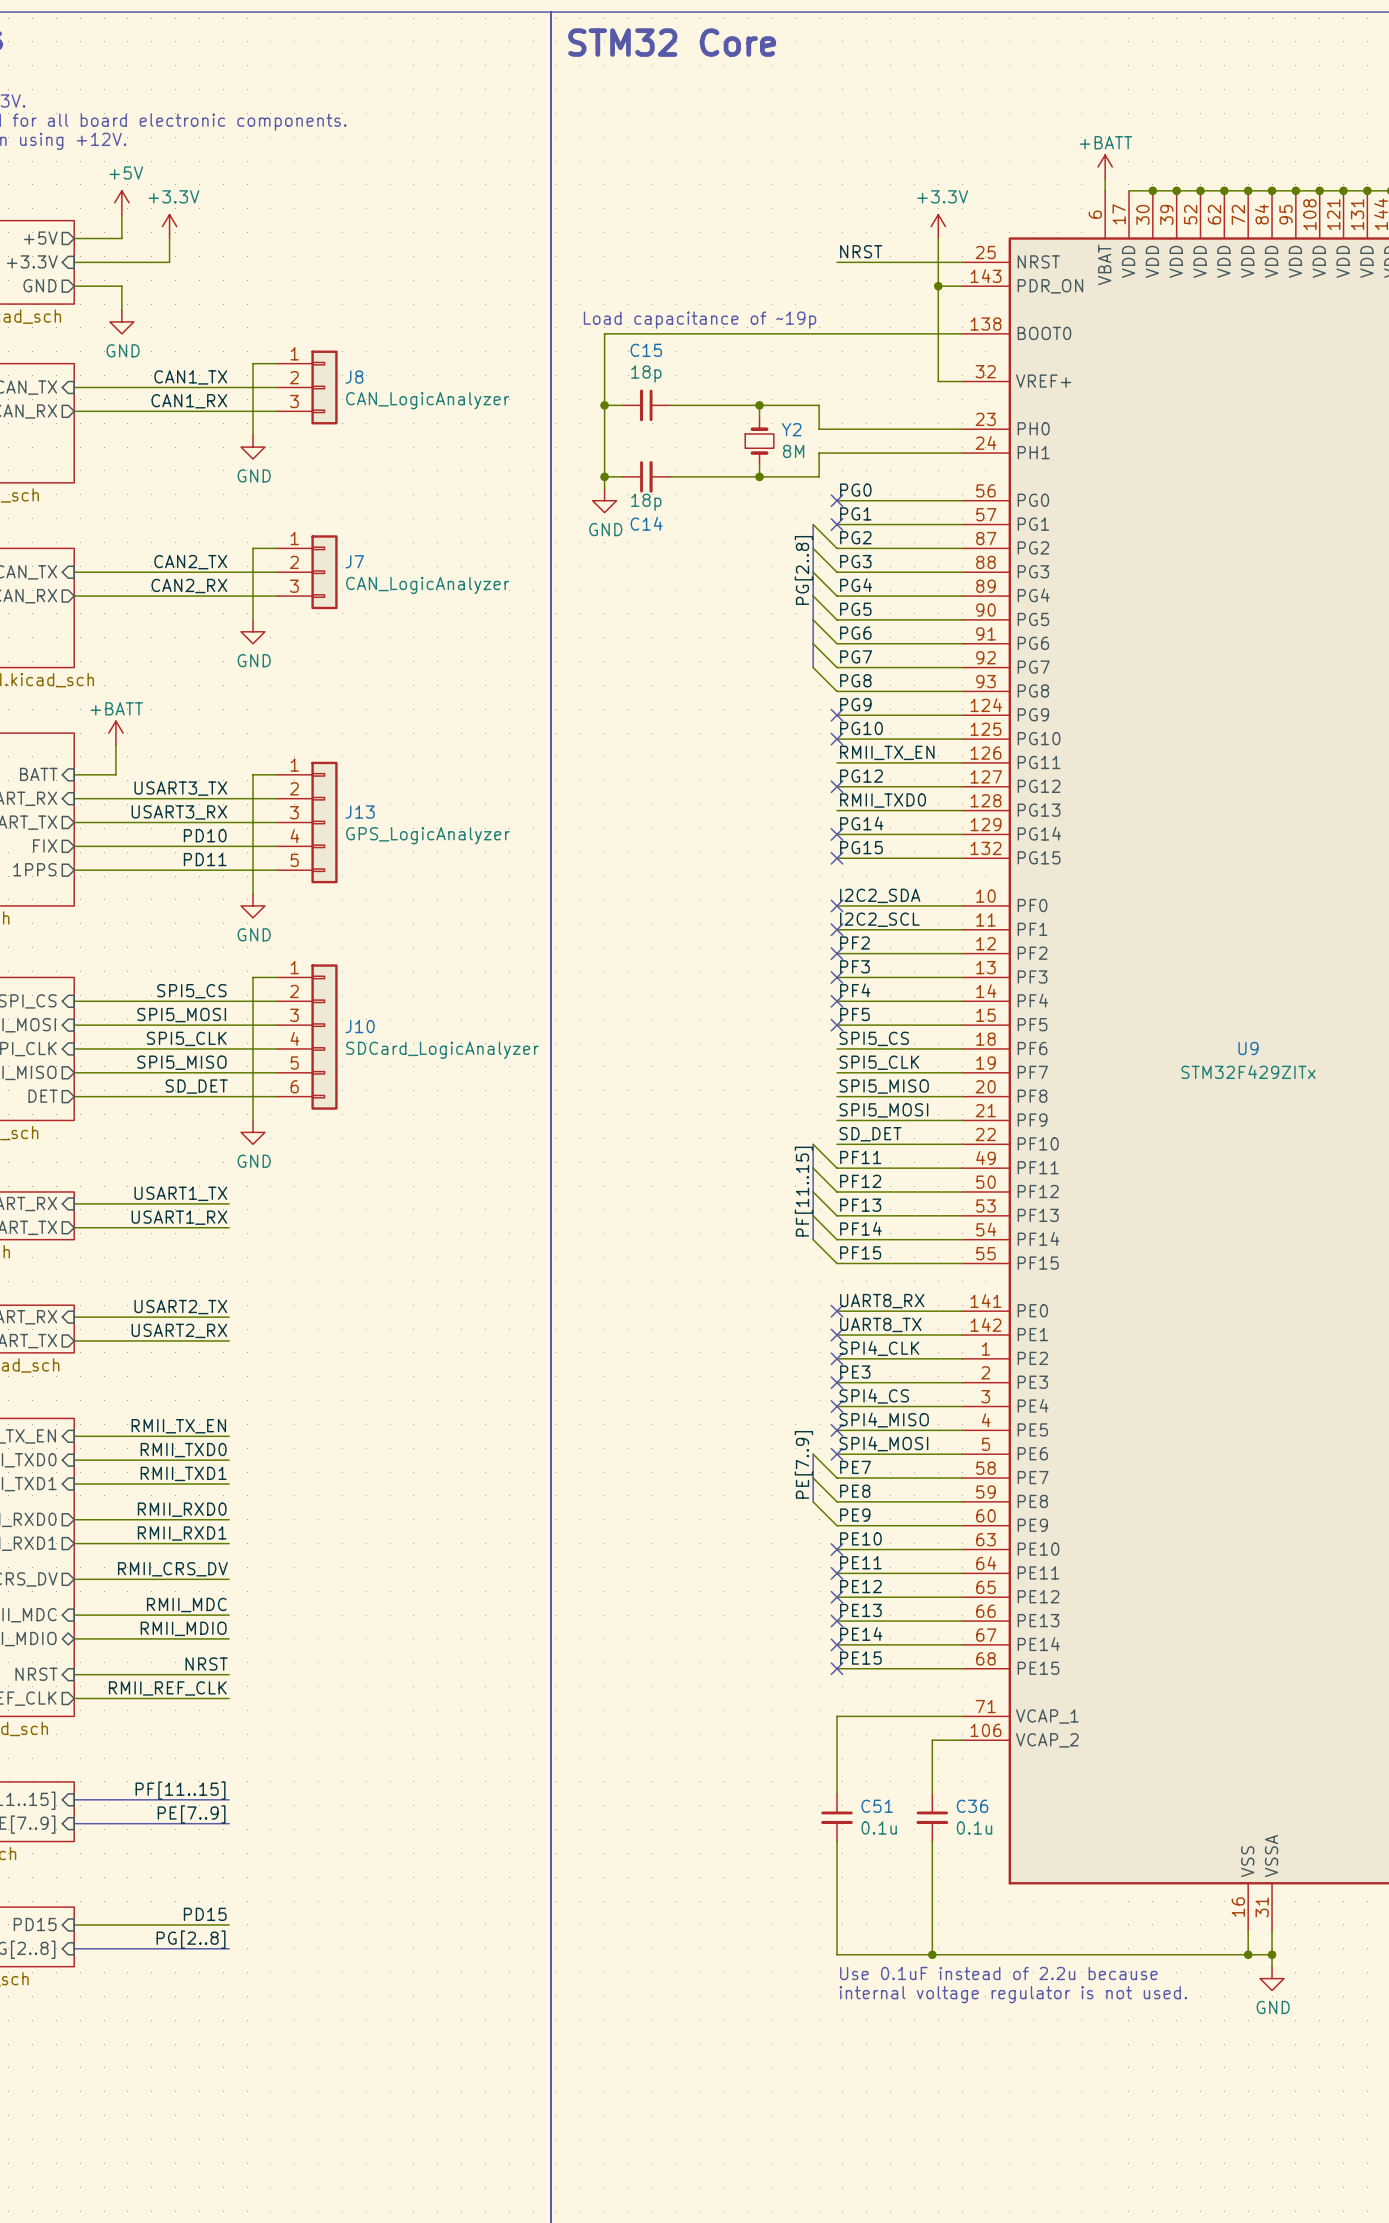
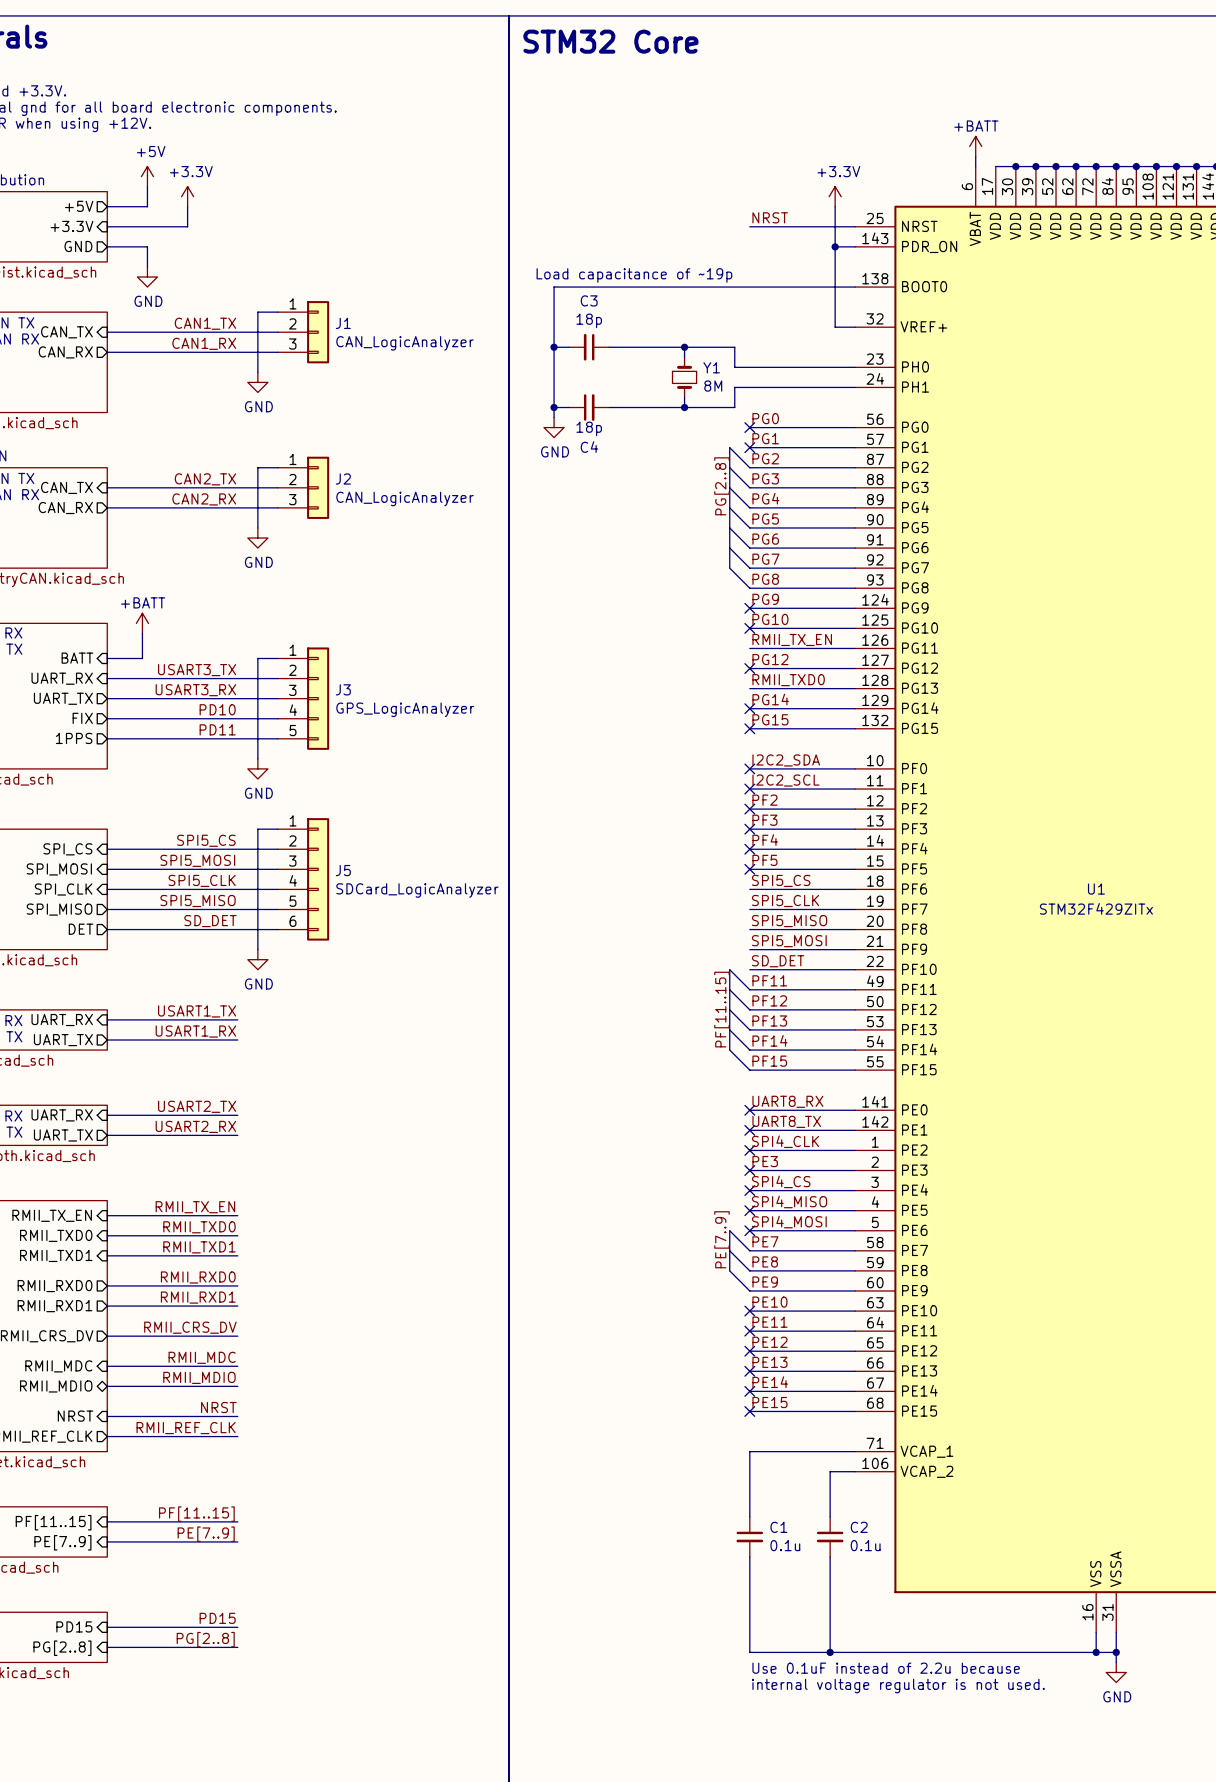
C15 name: C15 (646, 350) -> C3 (589, 300)
J8 name: J8 (354, 377) -> J1 (343, 323)
Y2 name: Y2 (791, 429) -> Y1 (711, 367)
C14 name: C14 (646, 523) -> C4 (589, 447)
J7 name: J7 (354, 561) -> J2 (343, 479)
J13 name: J13 (360, 812) -> J3 (343, 689)
J10 name: J10 (360, 1026) -> J5 (343, 870)
U9 name: U9 (1248, 1048) -> U1 (1096, 889)
C51 name: C51 (877, 1806) -> C1 (778, 1527)
C36 name: C36 (972, 1806) -> C2 (859, 1527)

